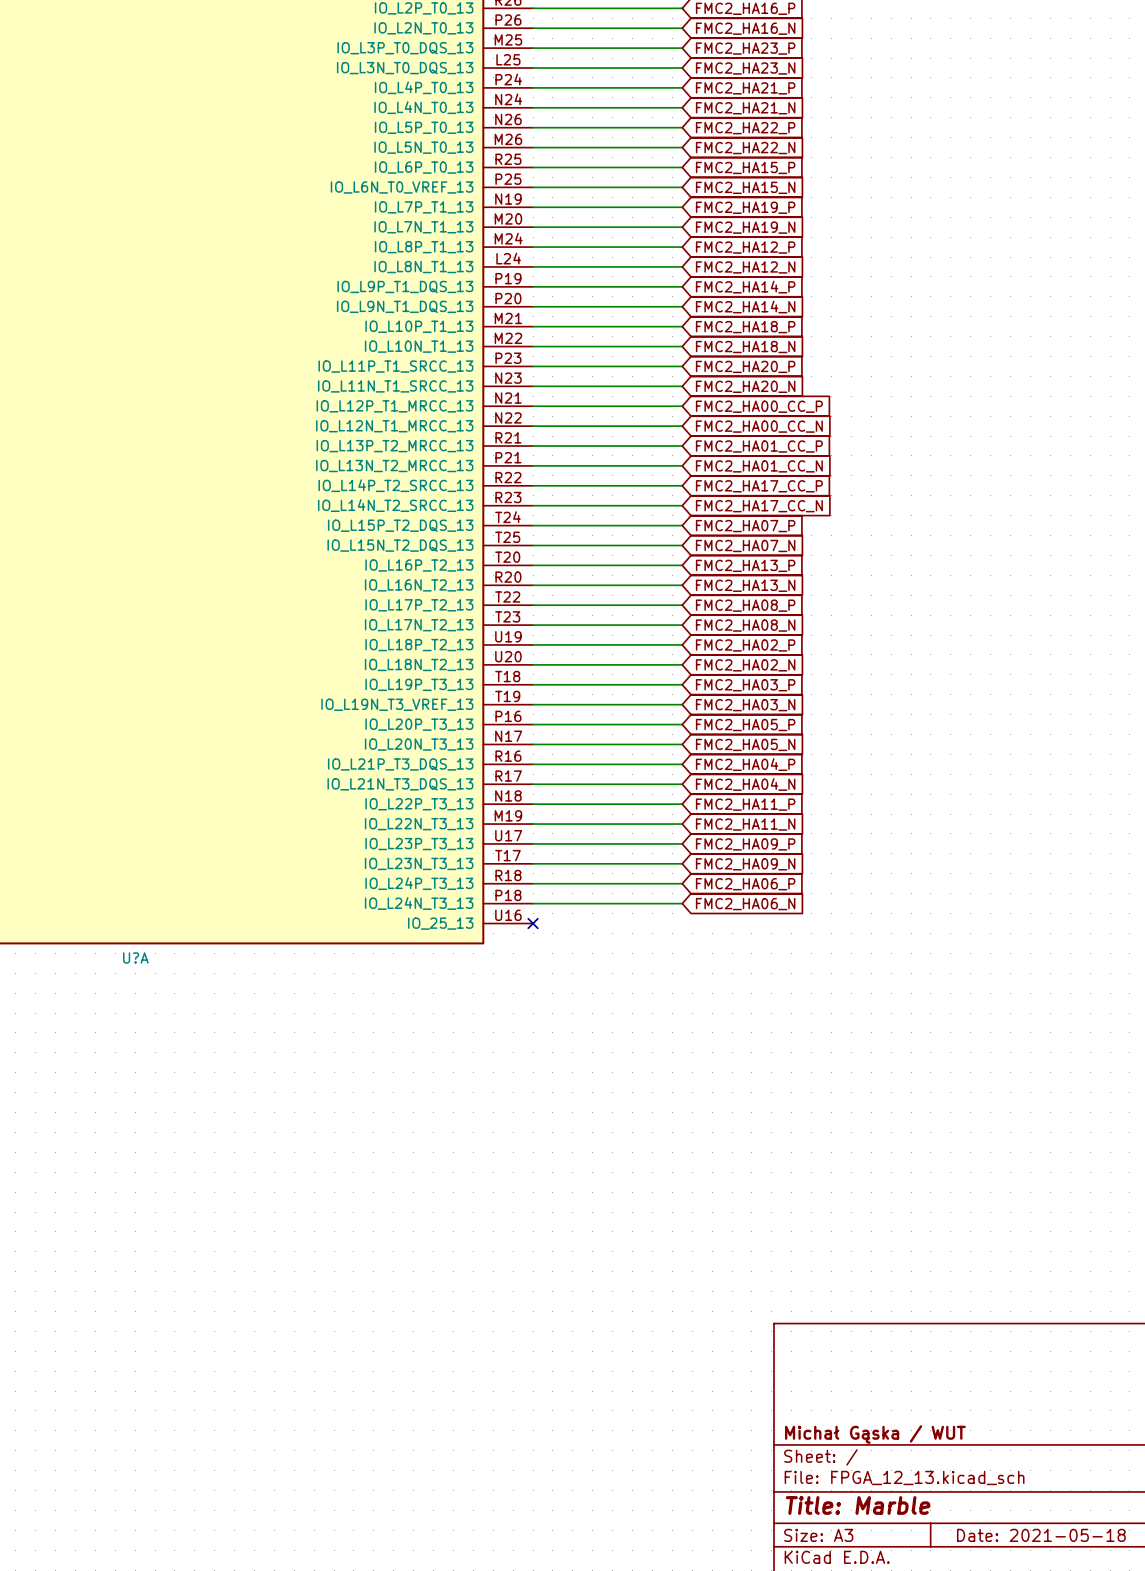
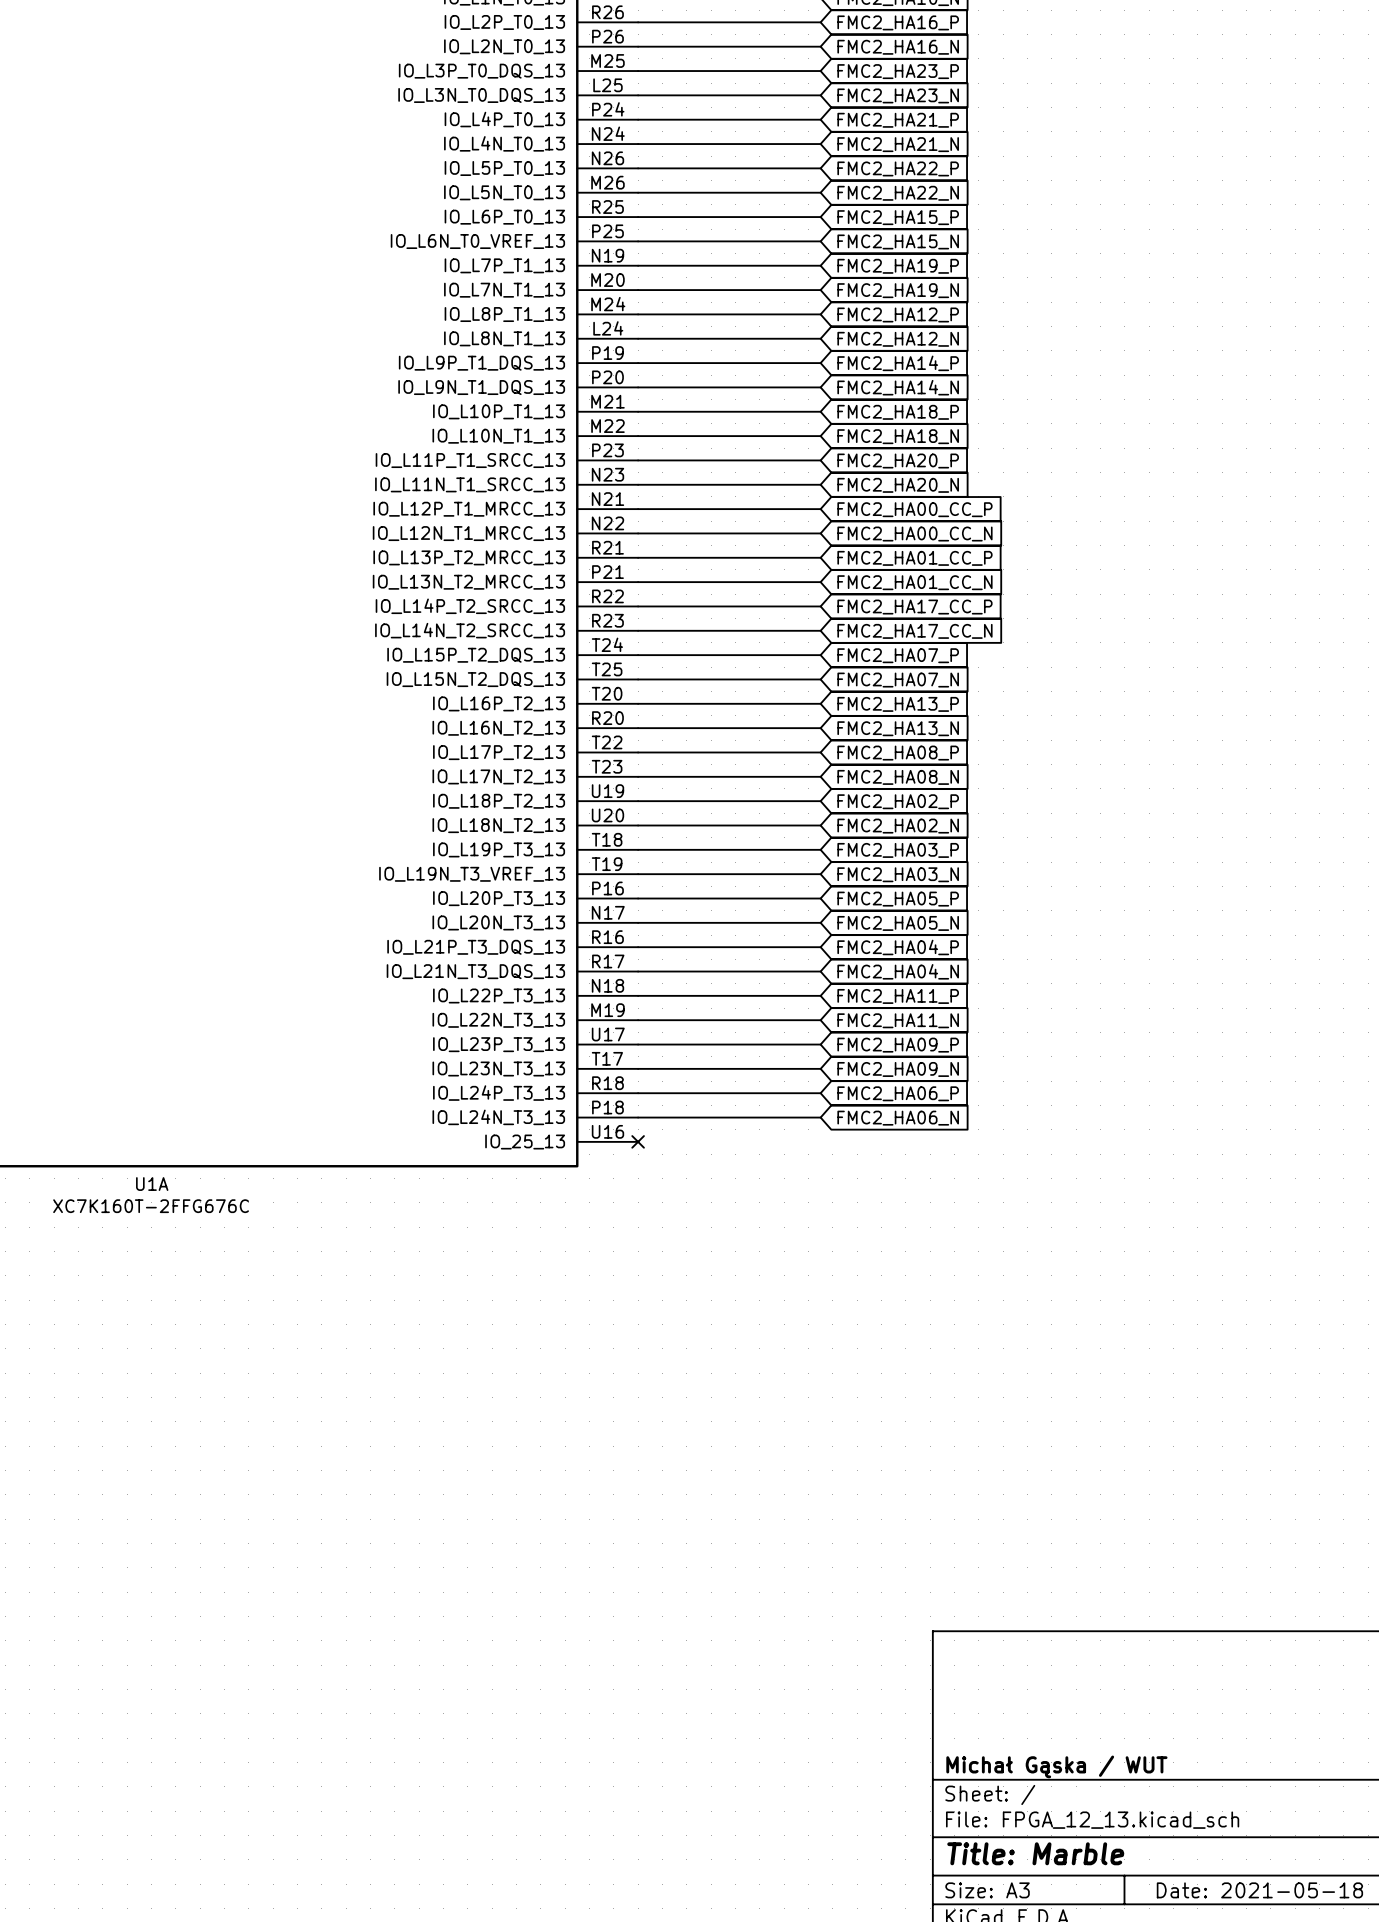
U?A name: U?A (135, 957) -> U1A (152, 1184)
U?A value: none -> XC7K160T-2FFG676C (151, 1206)

